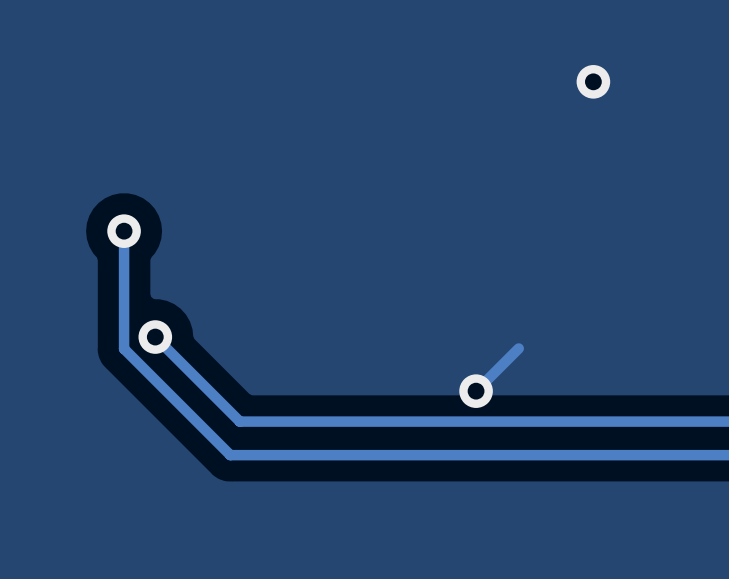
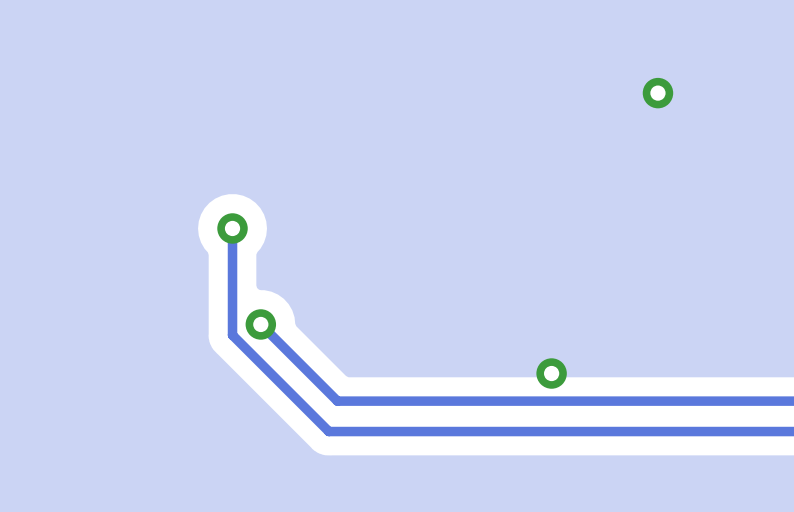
track: (518, 348) (476, 391) -> none

